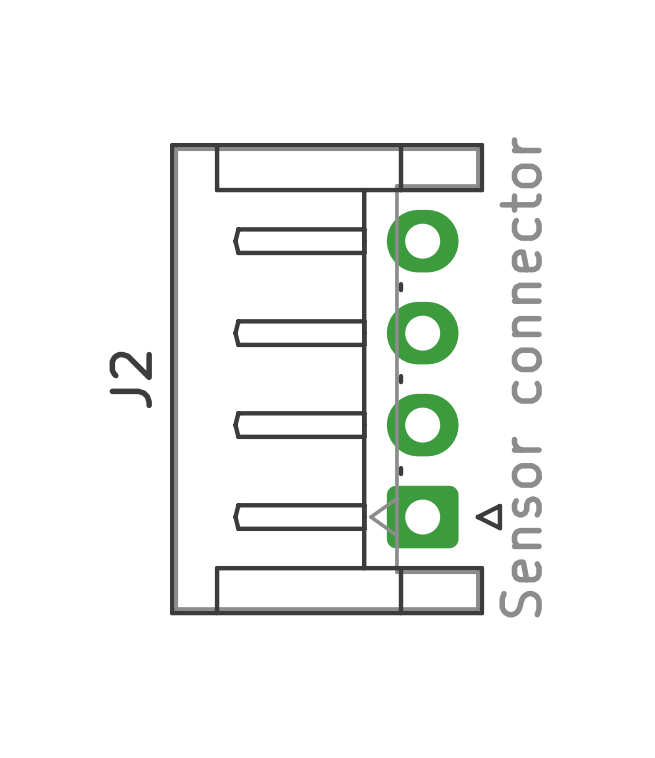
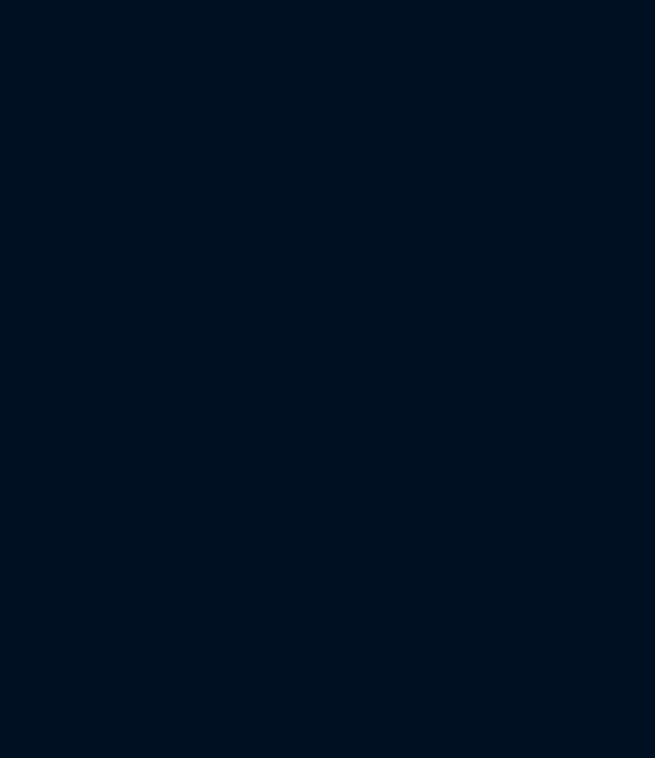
J2: Sensor connector (336, 379) -> none

